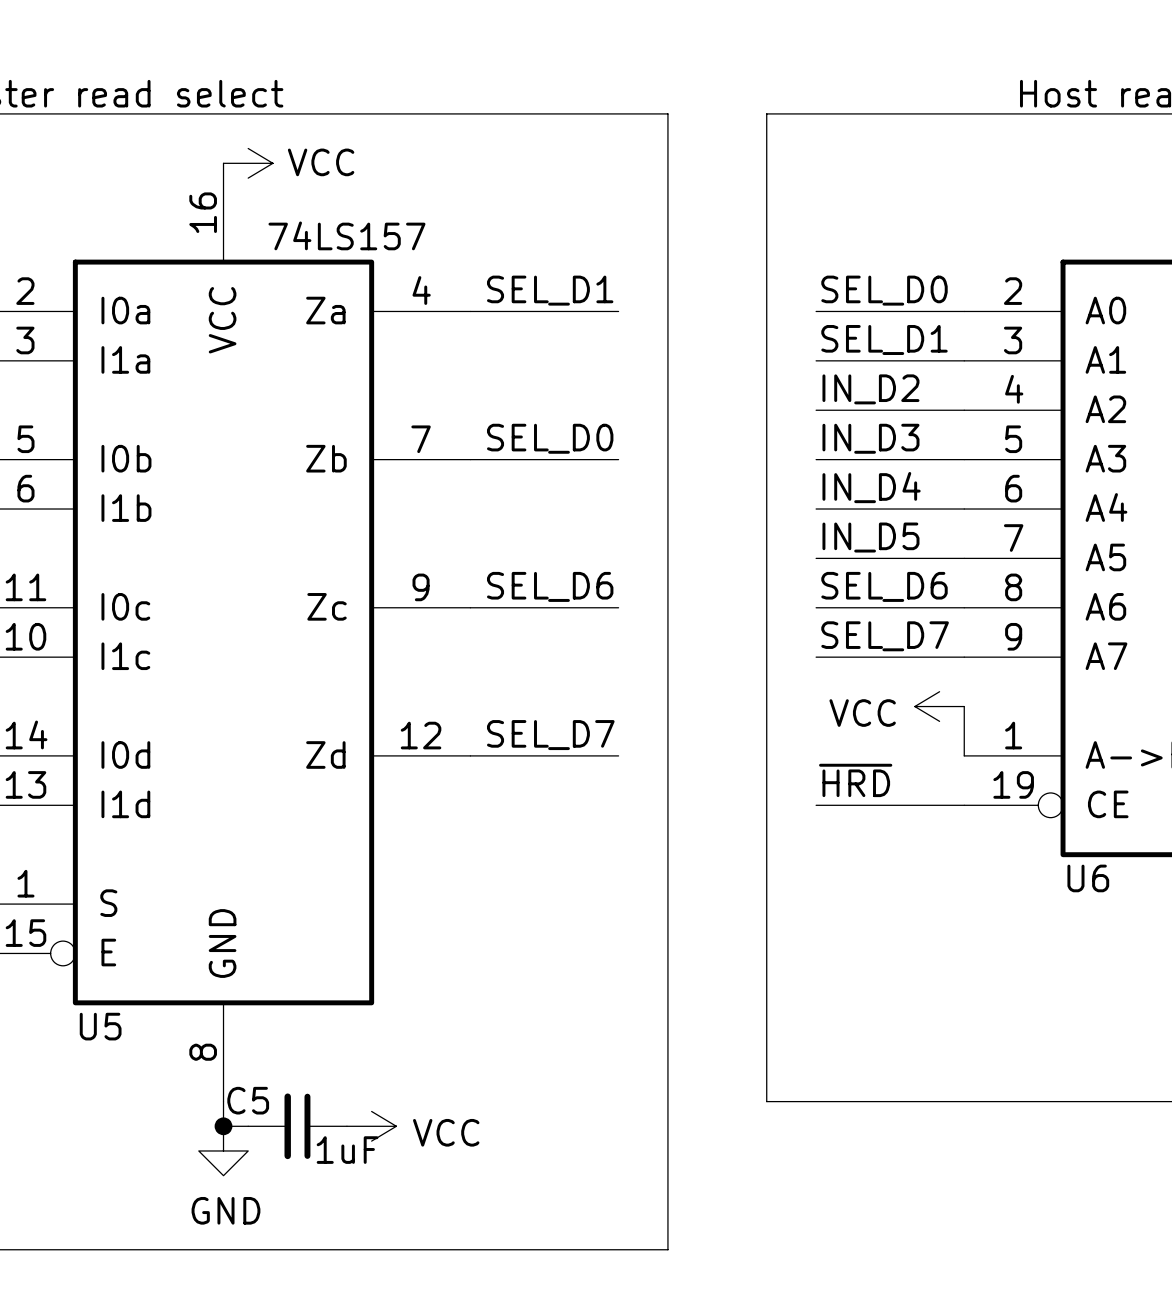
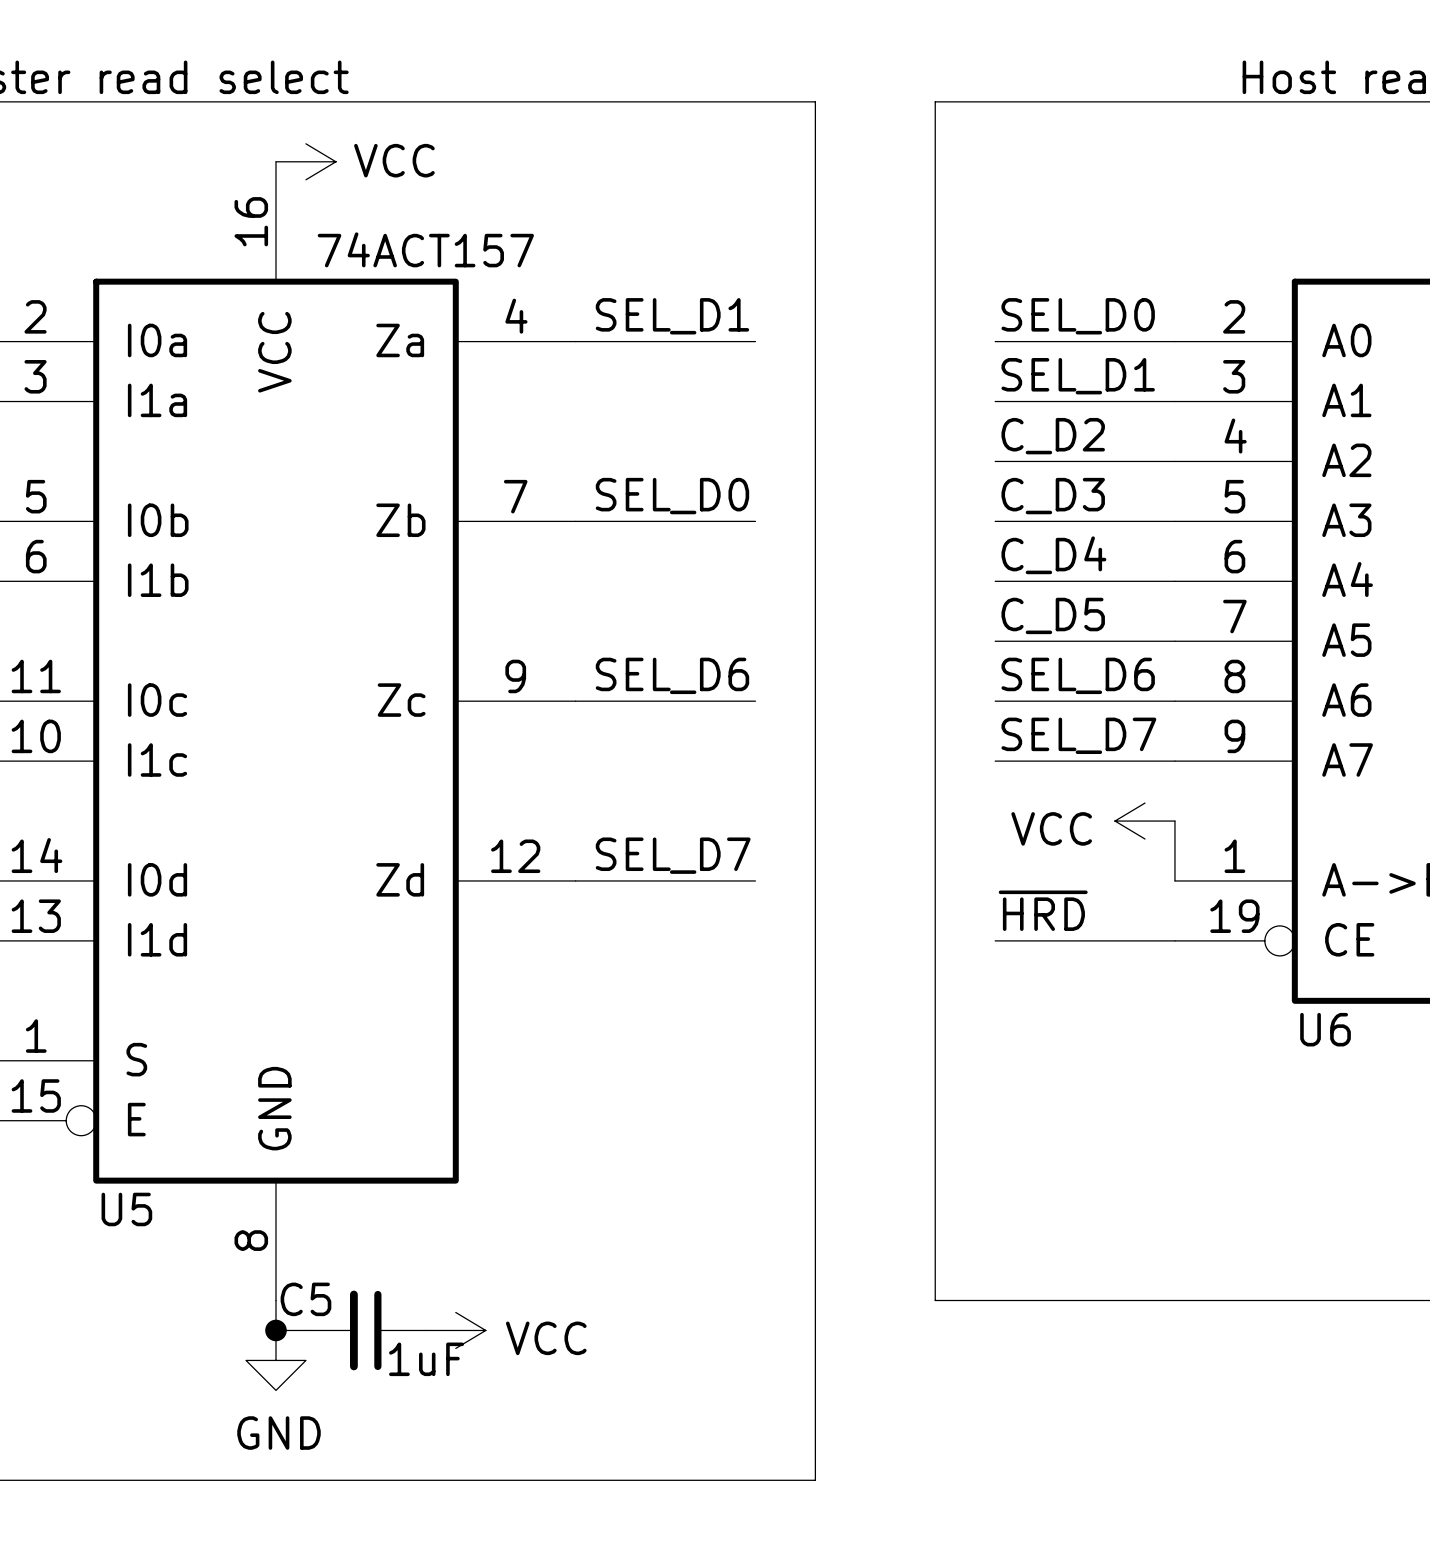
U5 value: 74LS157 (346, 235) -> 74ACT157 (425, 249)
label: IN_D2 (870, 389) -> C_D2 (1053, 436)
label: IN_D3 (870, 438) -> C_D3 (1053, 496)
label: IN_D4 (871, 487) -> C_D4 (1053, 555)
label: IN_D5 (870, 537) -> C_D5 (1053, 615)

